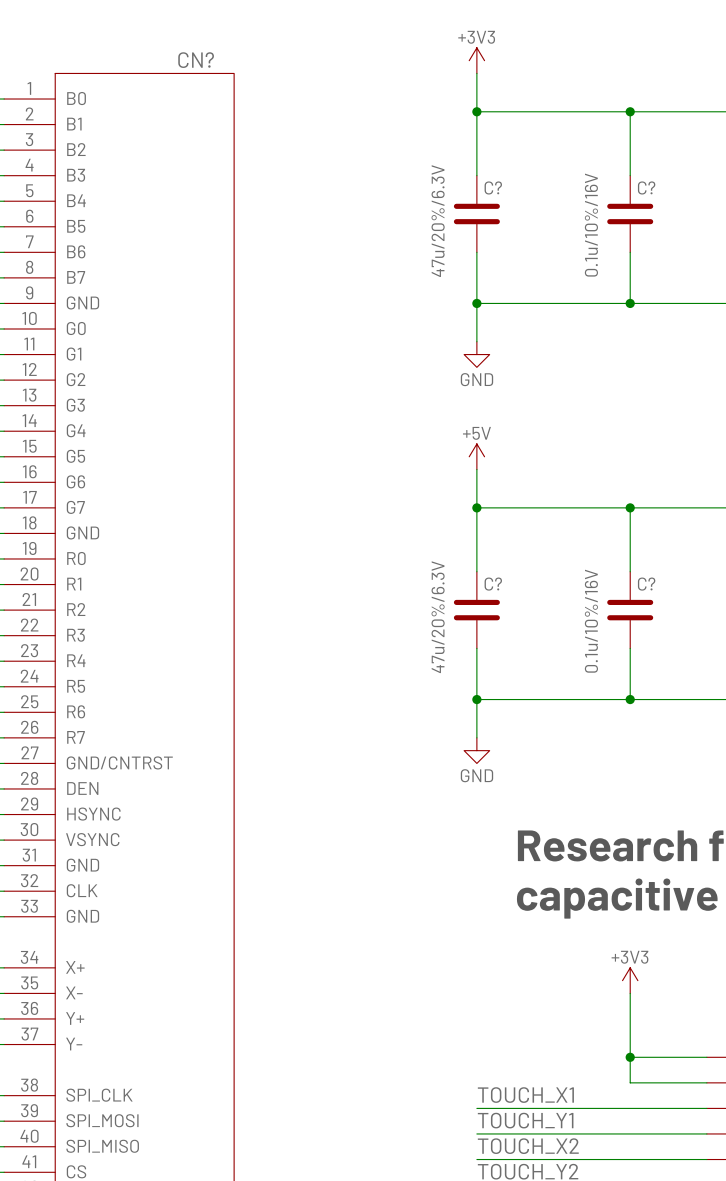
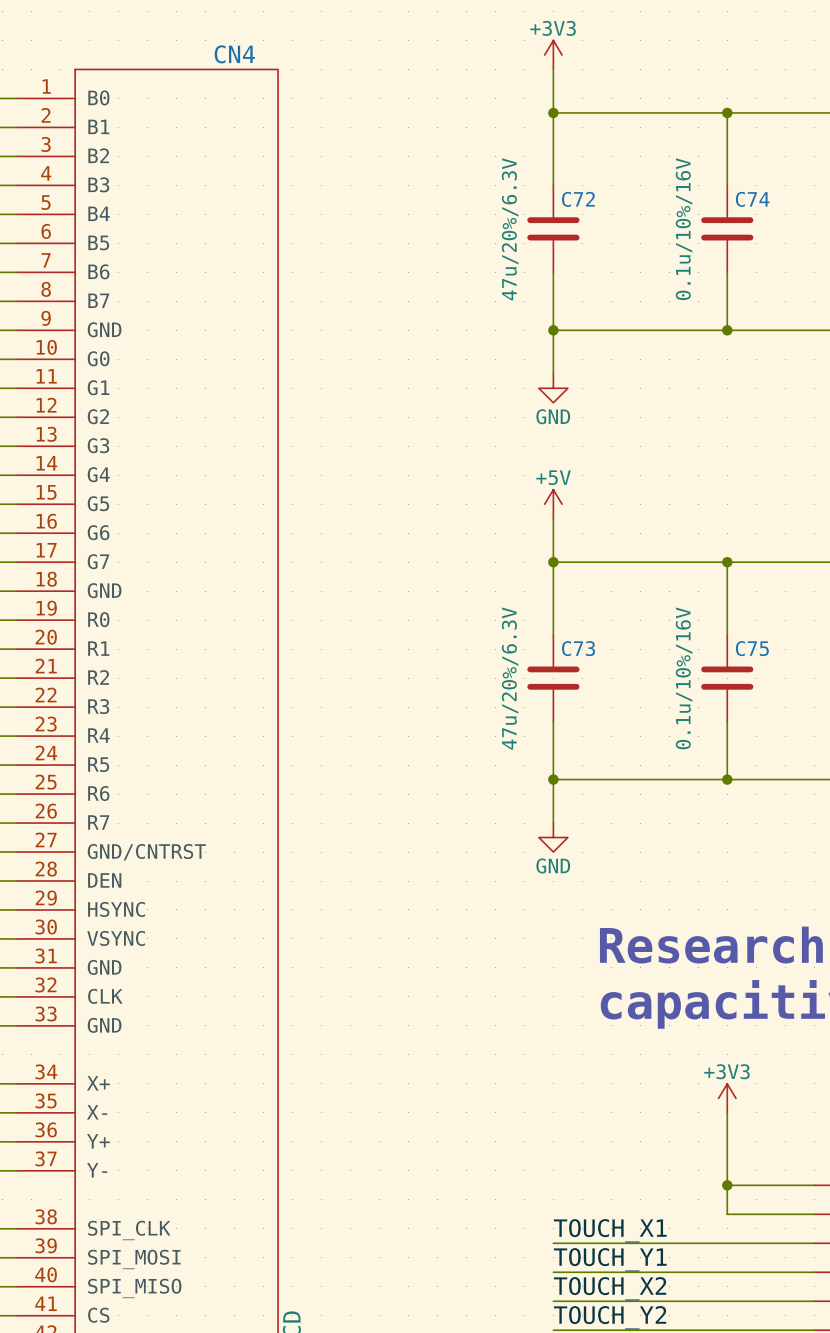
CN? name: CN? (196, 60) -> CN4 (234, 54)
C? name: C? (493, 187) -> C72 (578, 199)
C? name: C? (646, 187) -> C74 (752, 199)
C? name: C? (493, 584) -> C73 (578, 648)
C? name: C? (646, 584) -> C75 (752, 648)

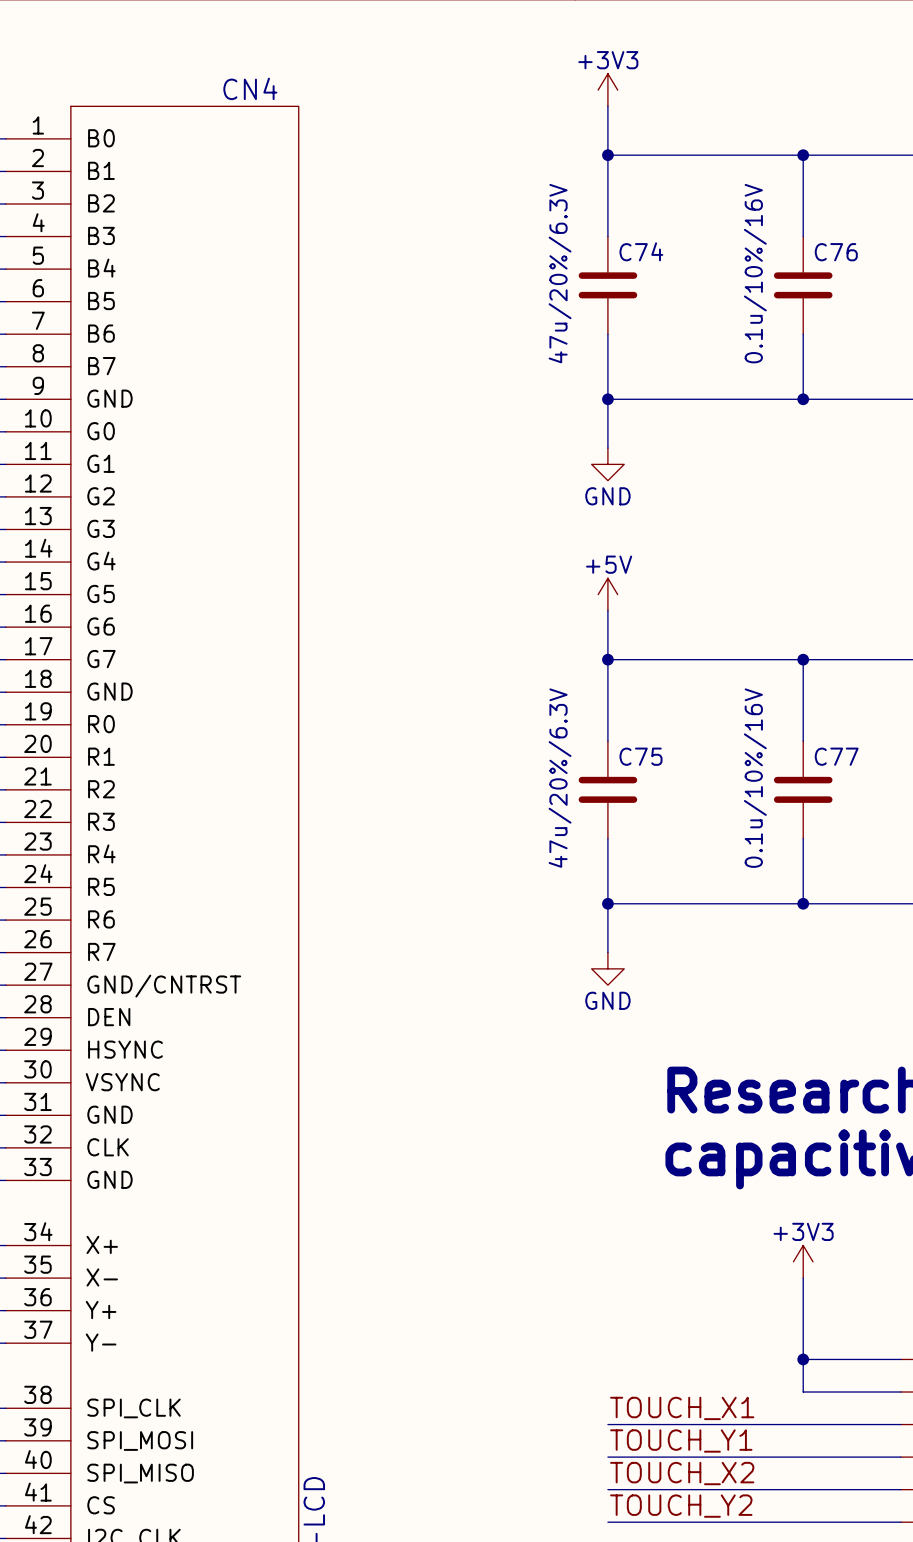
C72 name: C72 (578, 199) -> C74 (641, 251)
C74 name: C74 (752, 199) -> C76 (836, 252)
C73 name: C73 (578, 648) -> C75 (640, 756)
C75 name: C75 (752, 648) -> C77 (836, 756)

